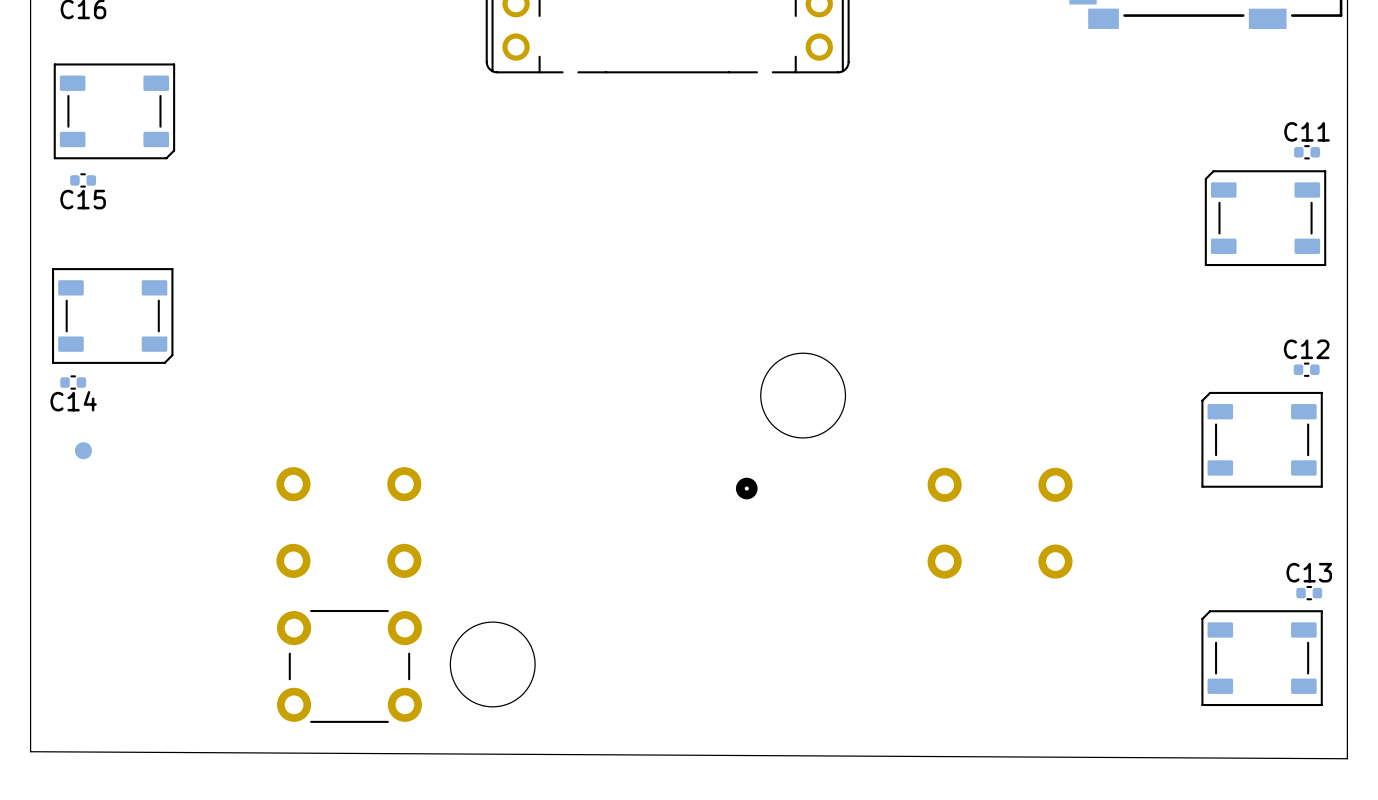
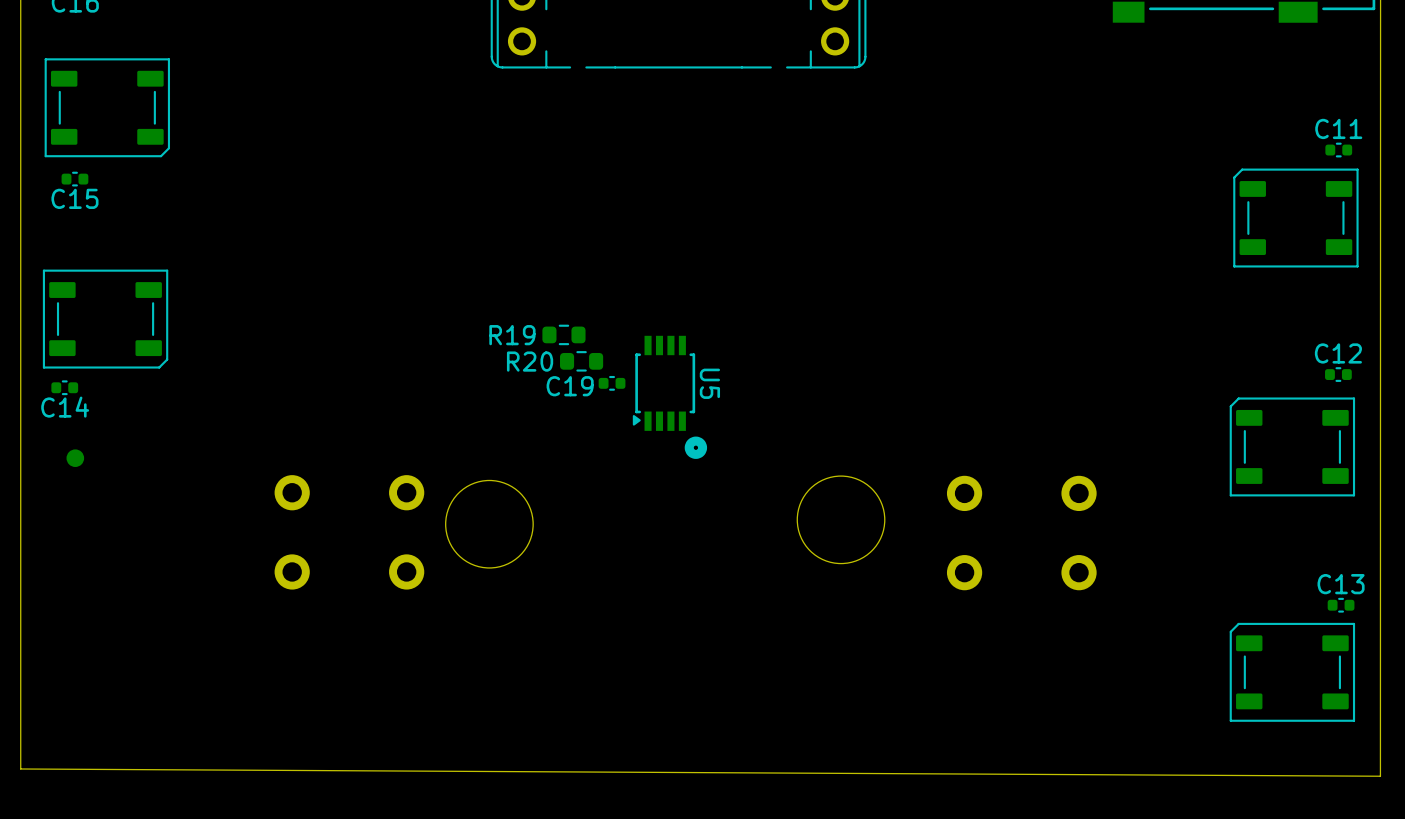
R19: none -> (563, 334)
R20: none -> (581, 361)
C19: none -> (612, 383)
U5: none -> (663, 383)
round board edge position: (803, 395) -> (841, 519)
part position: (746, 488) -> (695, 447)
round board edge position: (492, 664) -> (489, 524)
part: (349, 666) -> none

